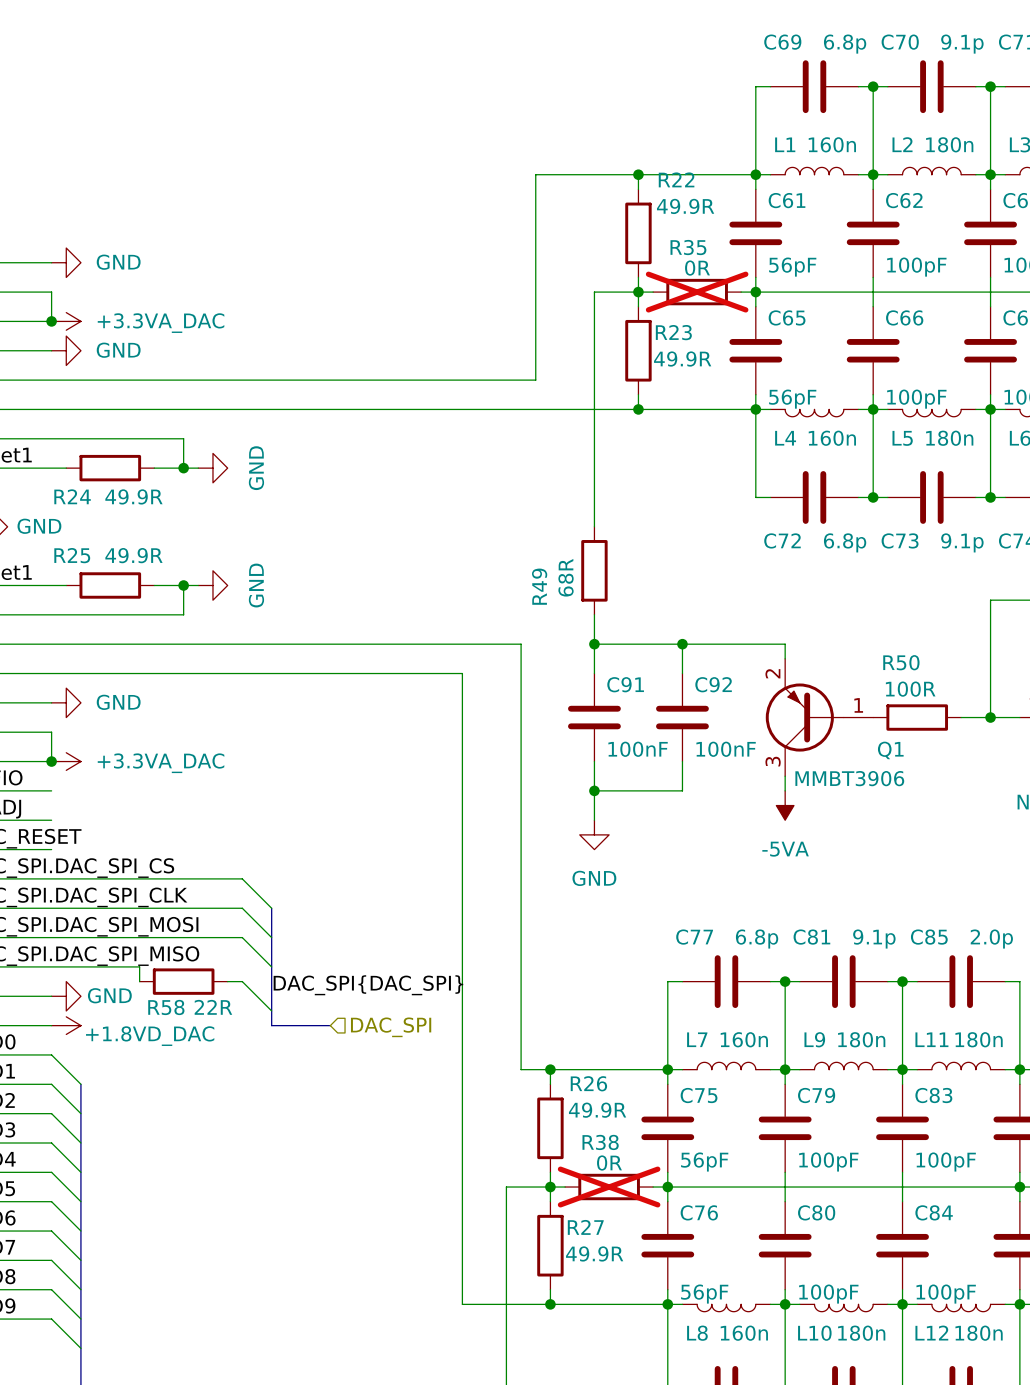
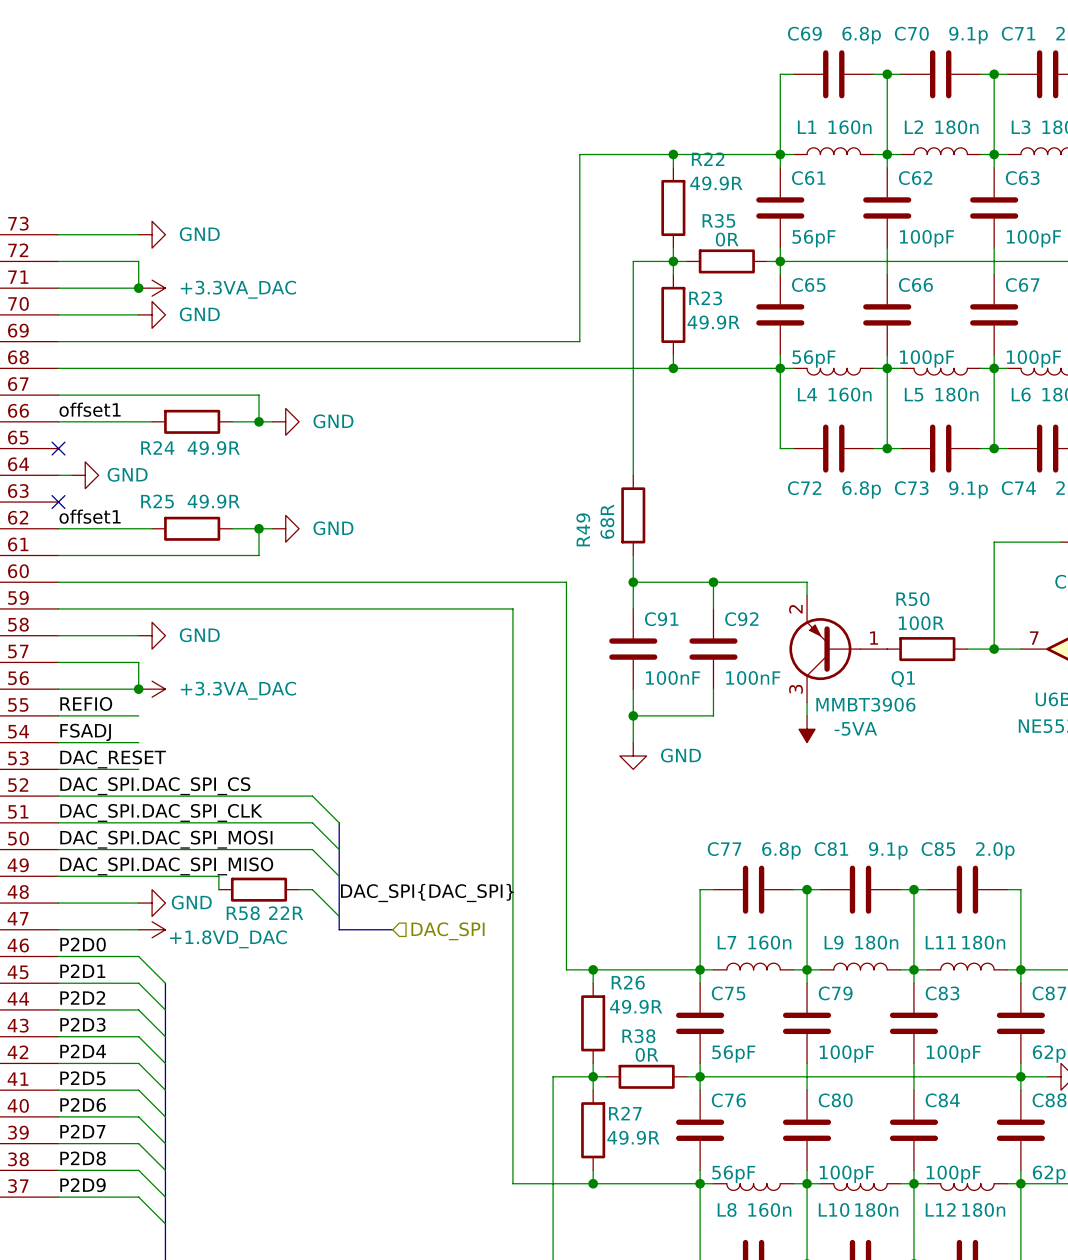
R35 do-not-place cross: (697, 292) -> none
power symbol text rotation: 0° (256, 468) -> 90° clockwise (333, 421)
power symbol text rotation: 0° (256, 585) -> 90° clockwise (333, 528)
power symbol text position: -5VA (785, 849) -> -5VA (855, 728)
power symbol text position: GND (594, 878) -> GND (680, 755)
R38 do-not-place cross: (609, 1187) -> none

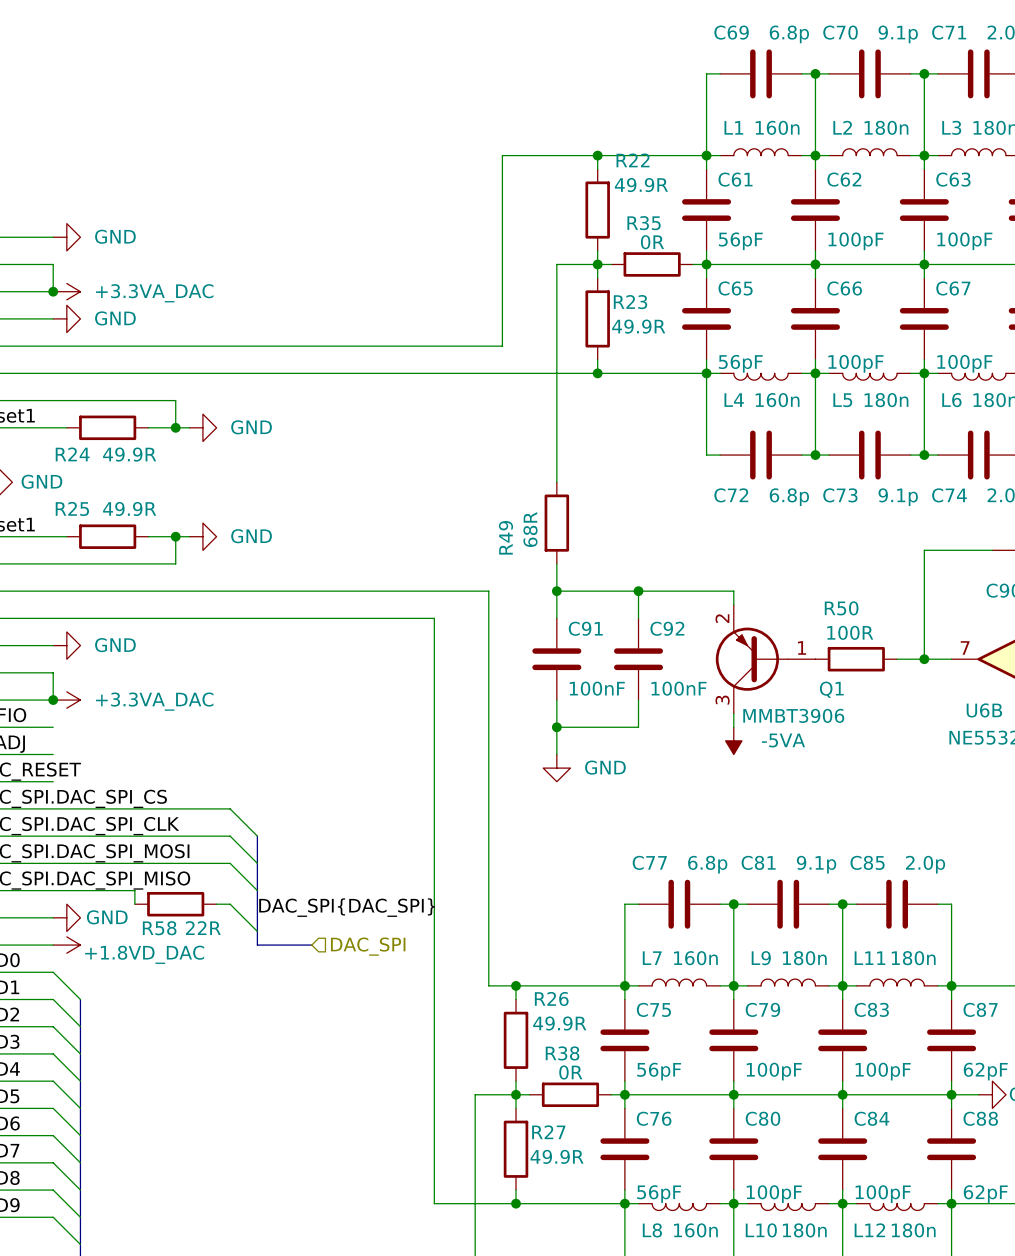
junction: none -> (815, 264)
junction: none -> (924, 264)
junction: none -> (733, 1094)
junction: none -> (842, 1094)

